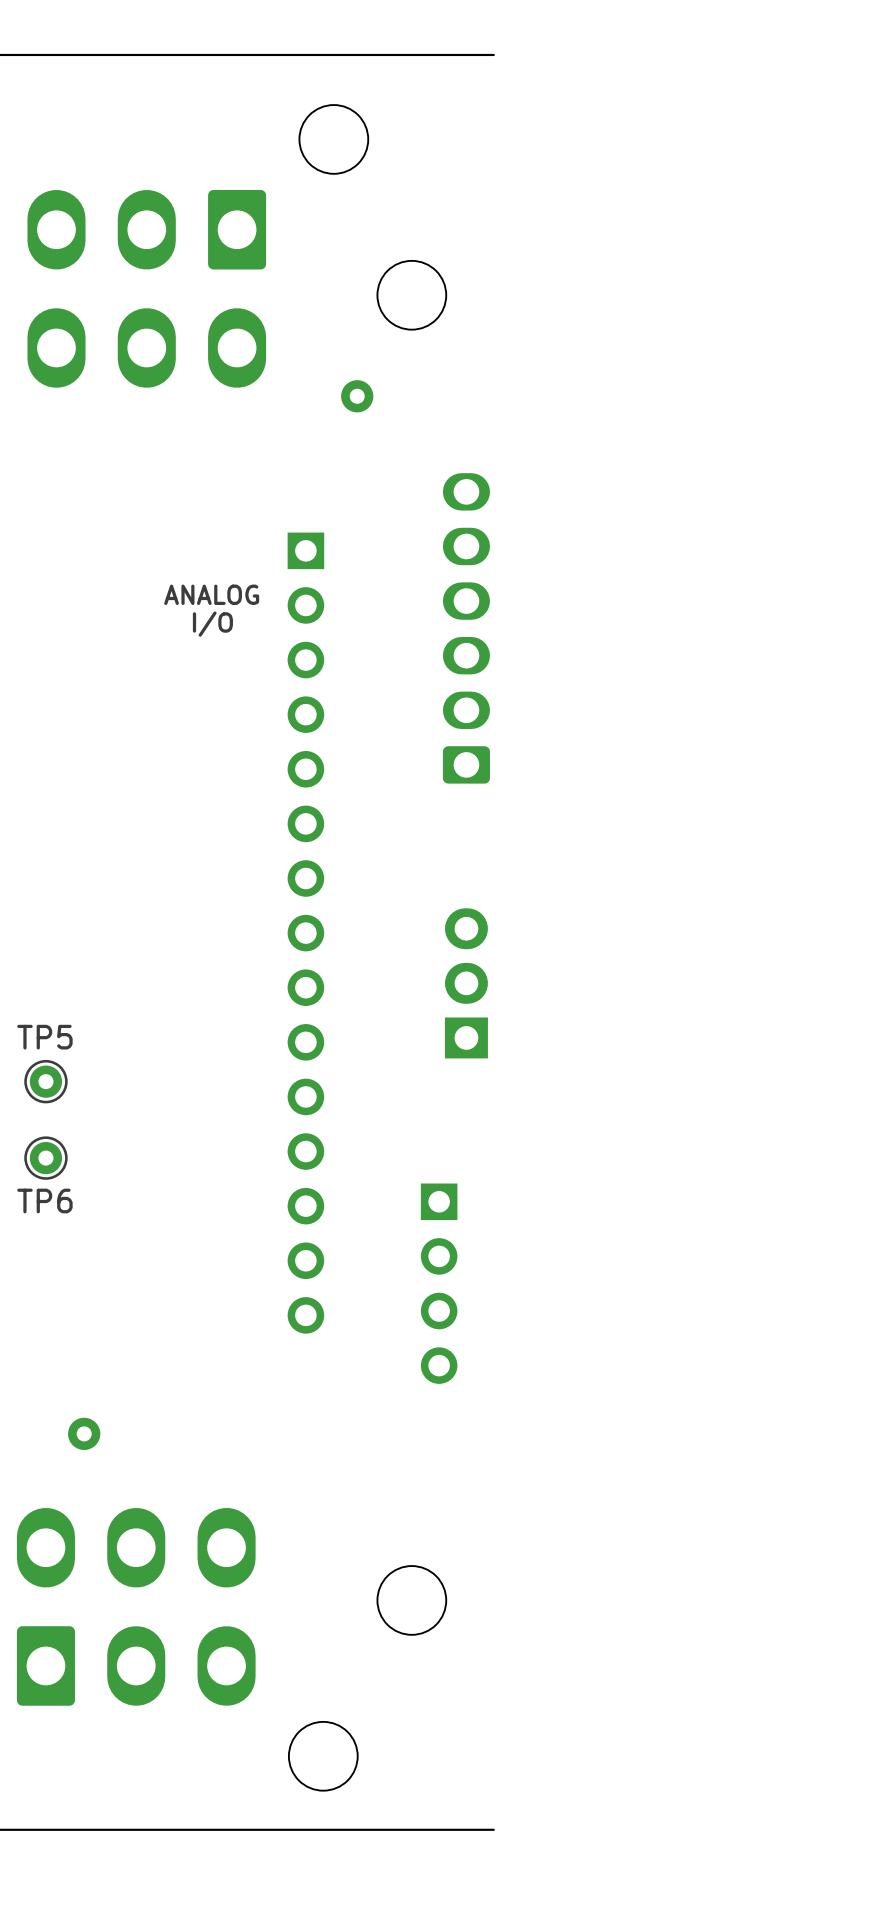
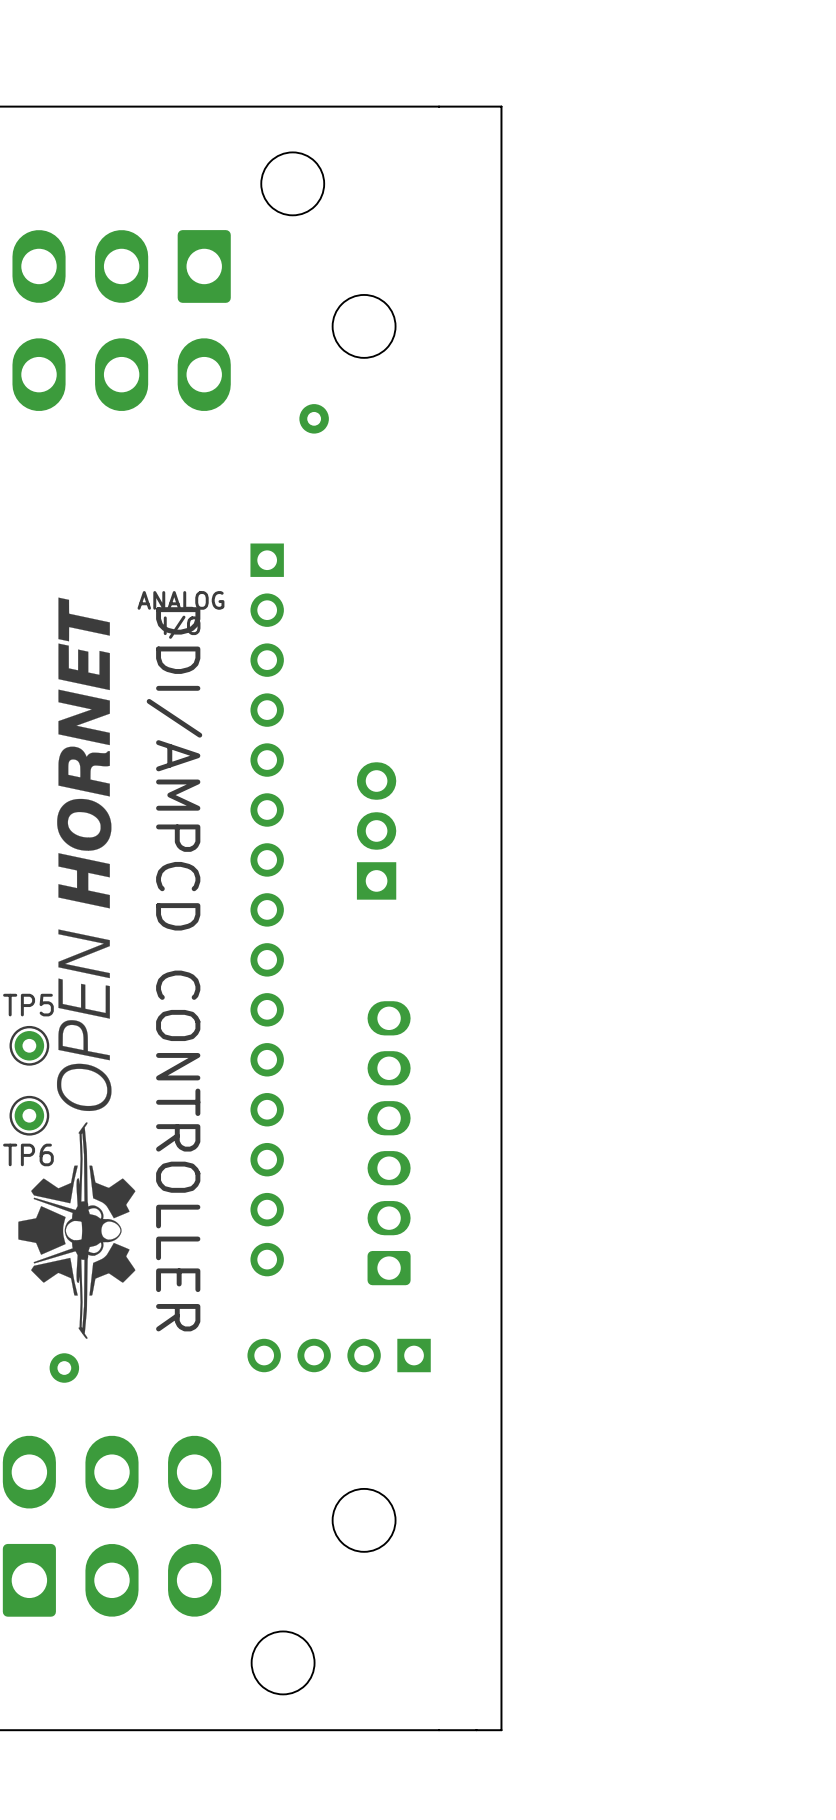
board edge: none -> (439, 106) (501, 106) (501, 1730) (439, 1730)
drawing: none -> [18, 597, 136, 1339]
part: (466, 628) -> none
part position: (466, 983) -> (376, 830)
text: none -> DDI/AMPCD CONTROLLER (174, 969)
part: none -> (389, 1143)
part rotation: 0° (439, 1283) -> 90° clockwise (339, 1355)
part position: (439, 1283) -> (339, 1355)

